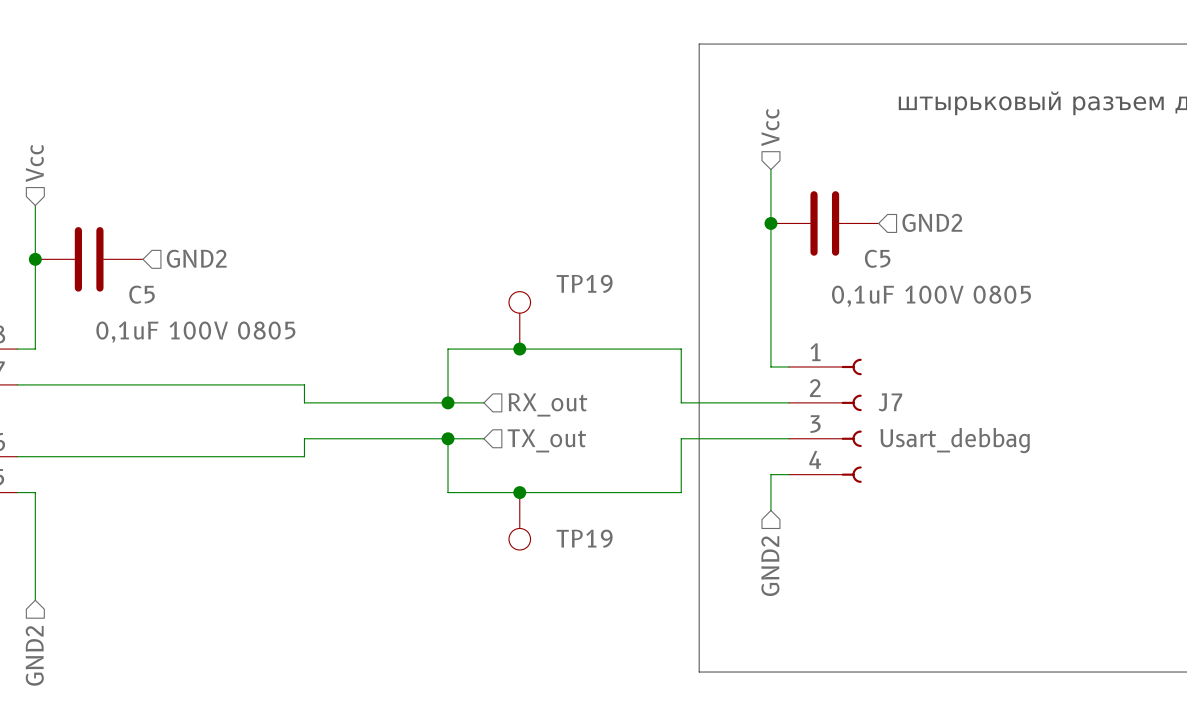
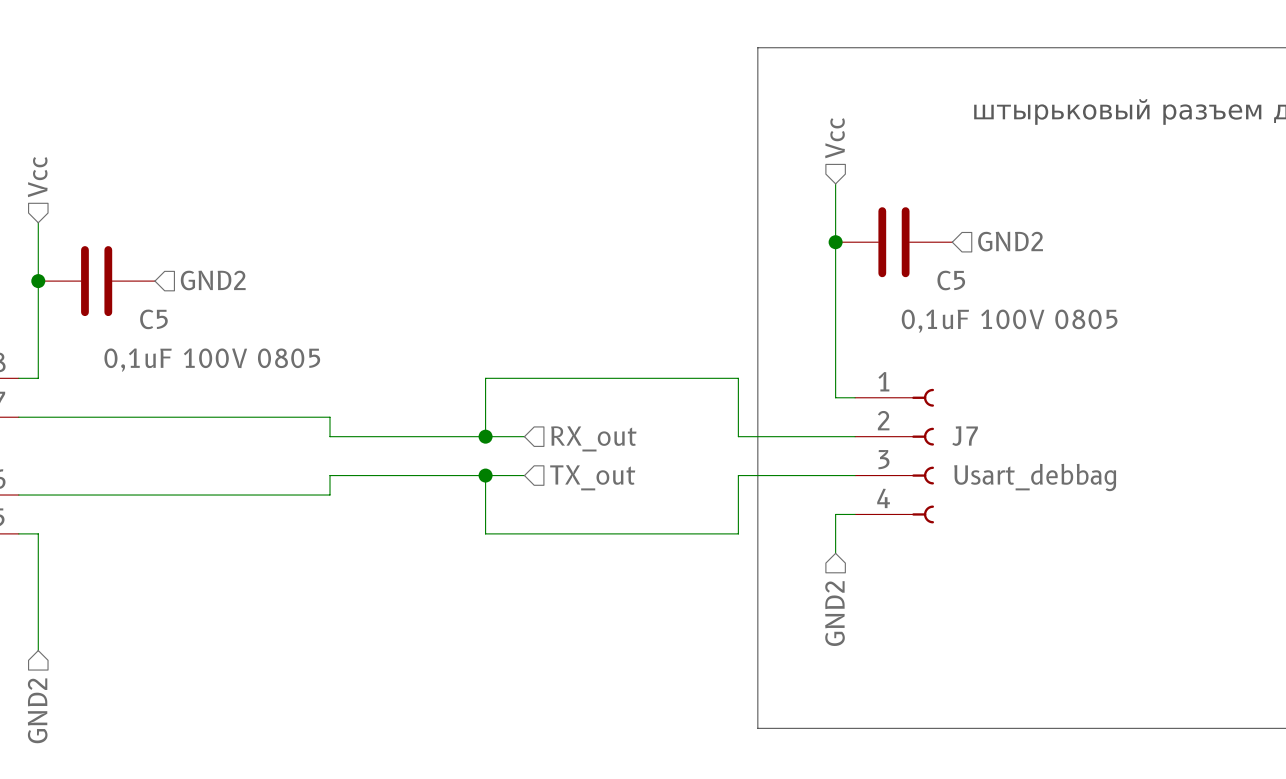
TP19: (519, 320) -> none
junction: (519, 349) -> none
junction: (519, 492) -> none
TP19: (519, 521) -> none

